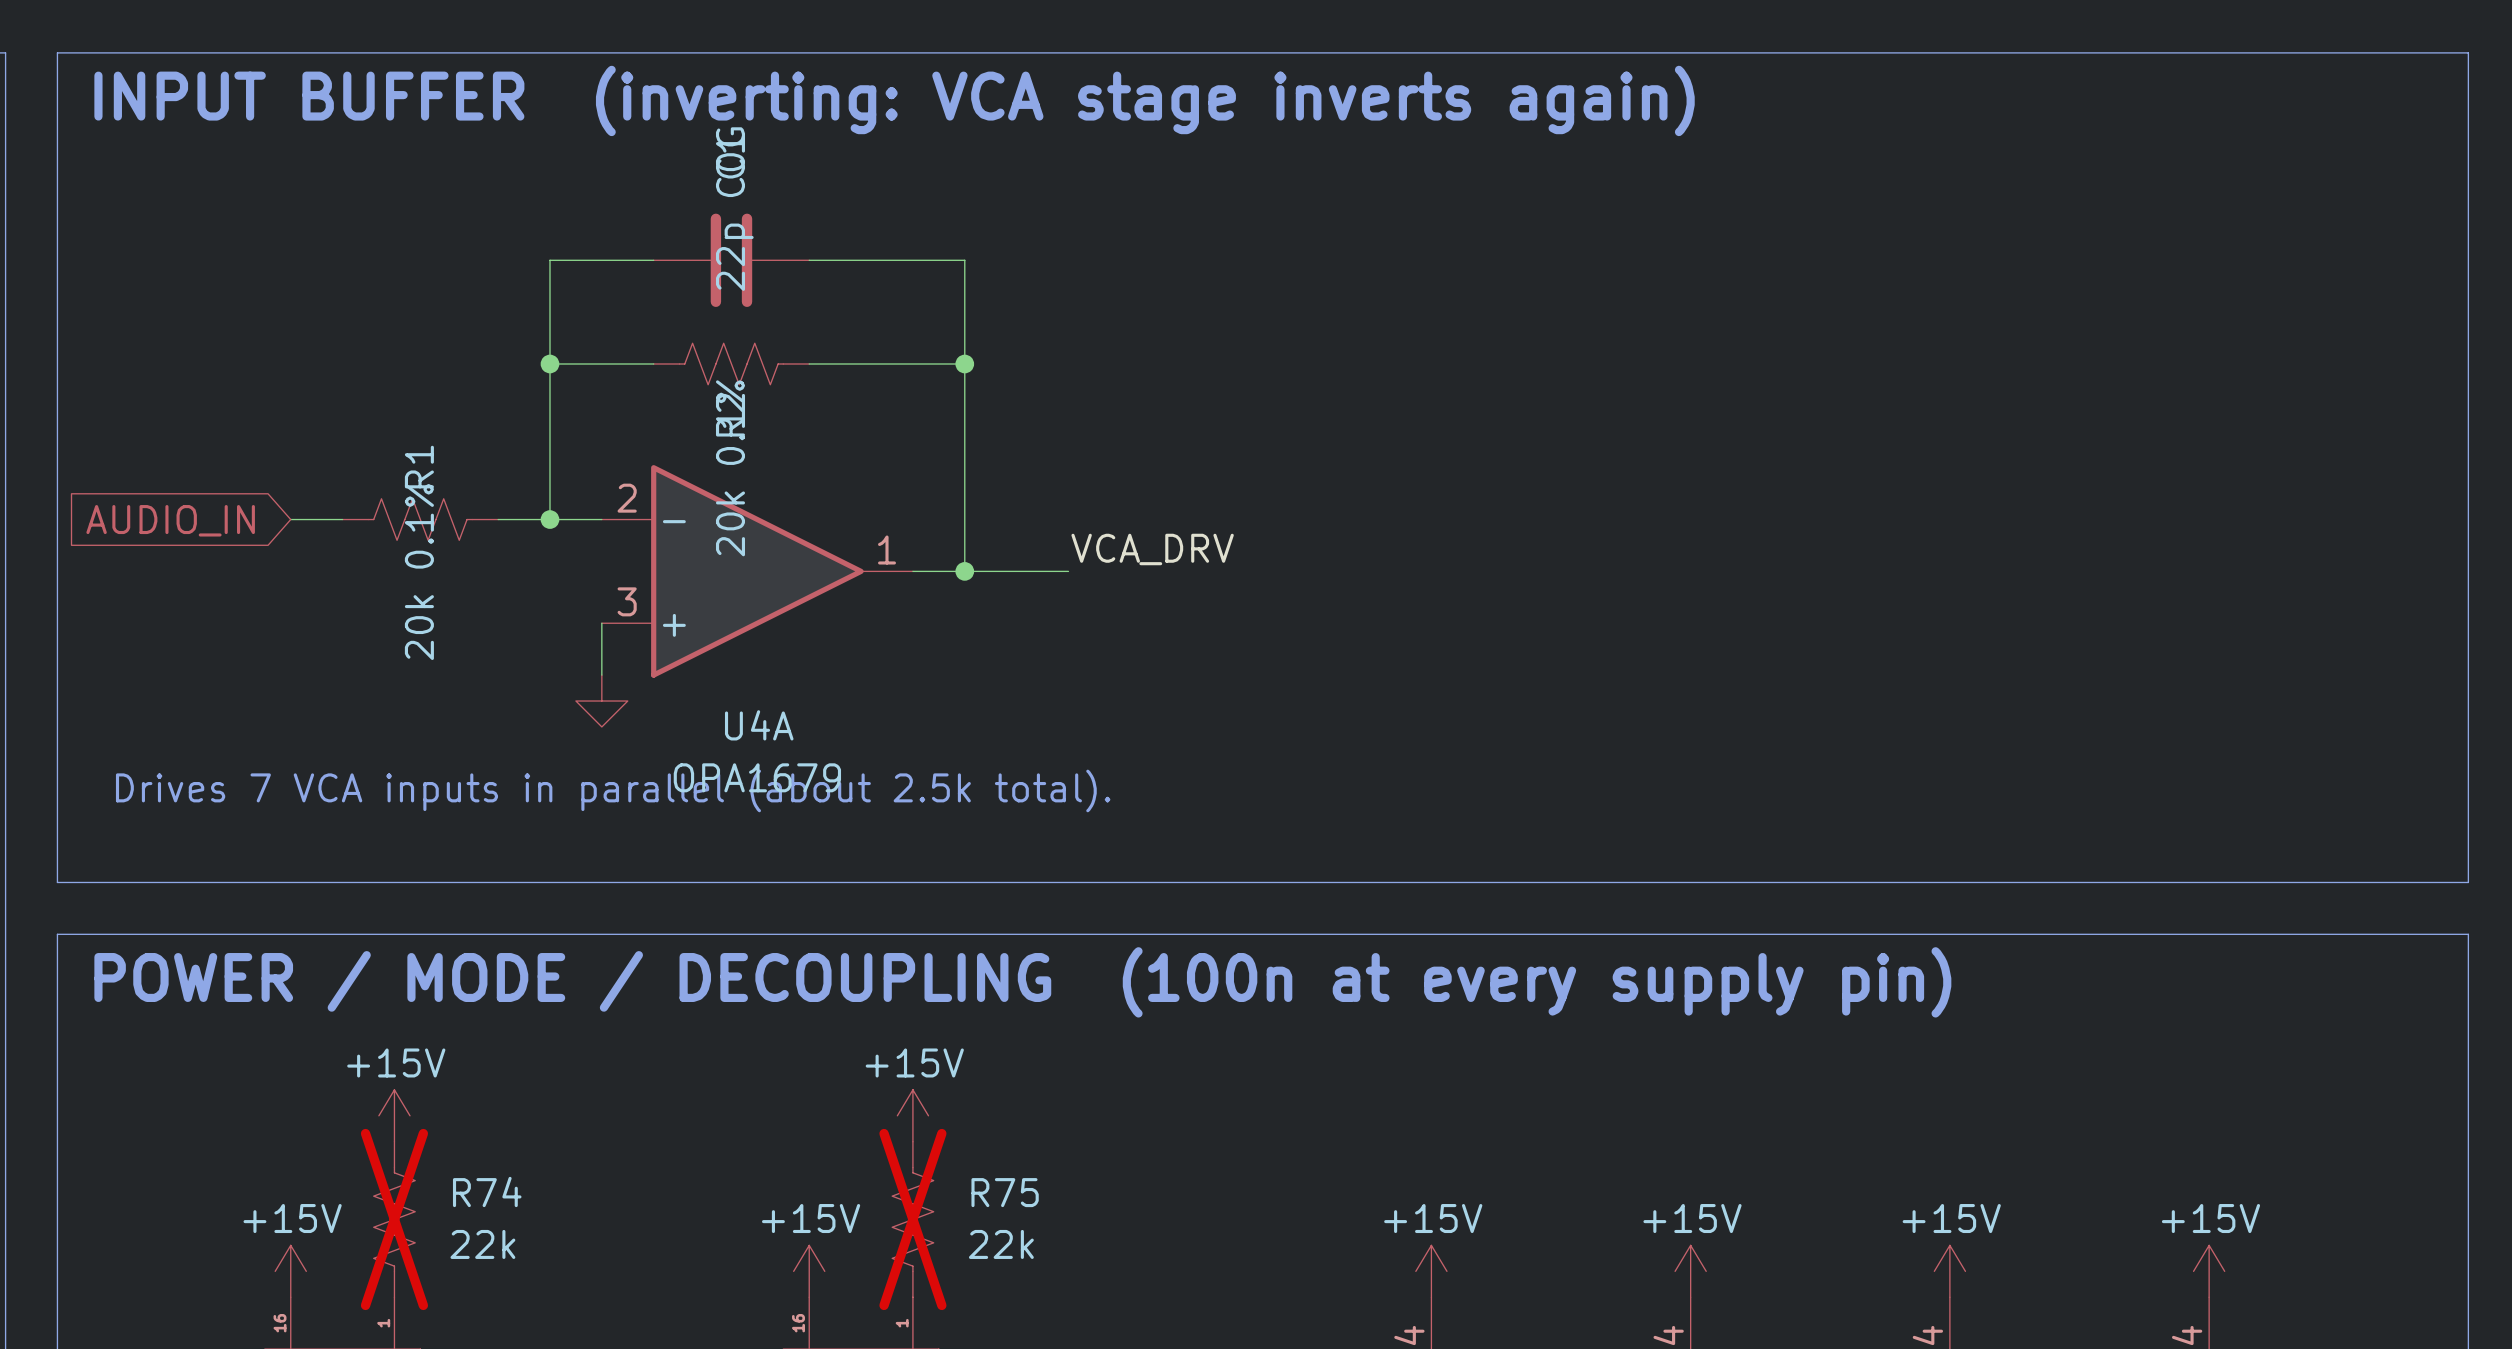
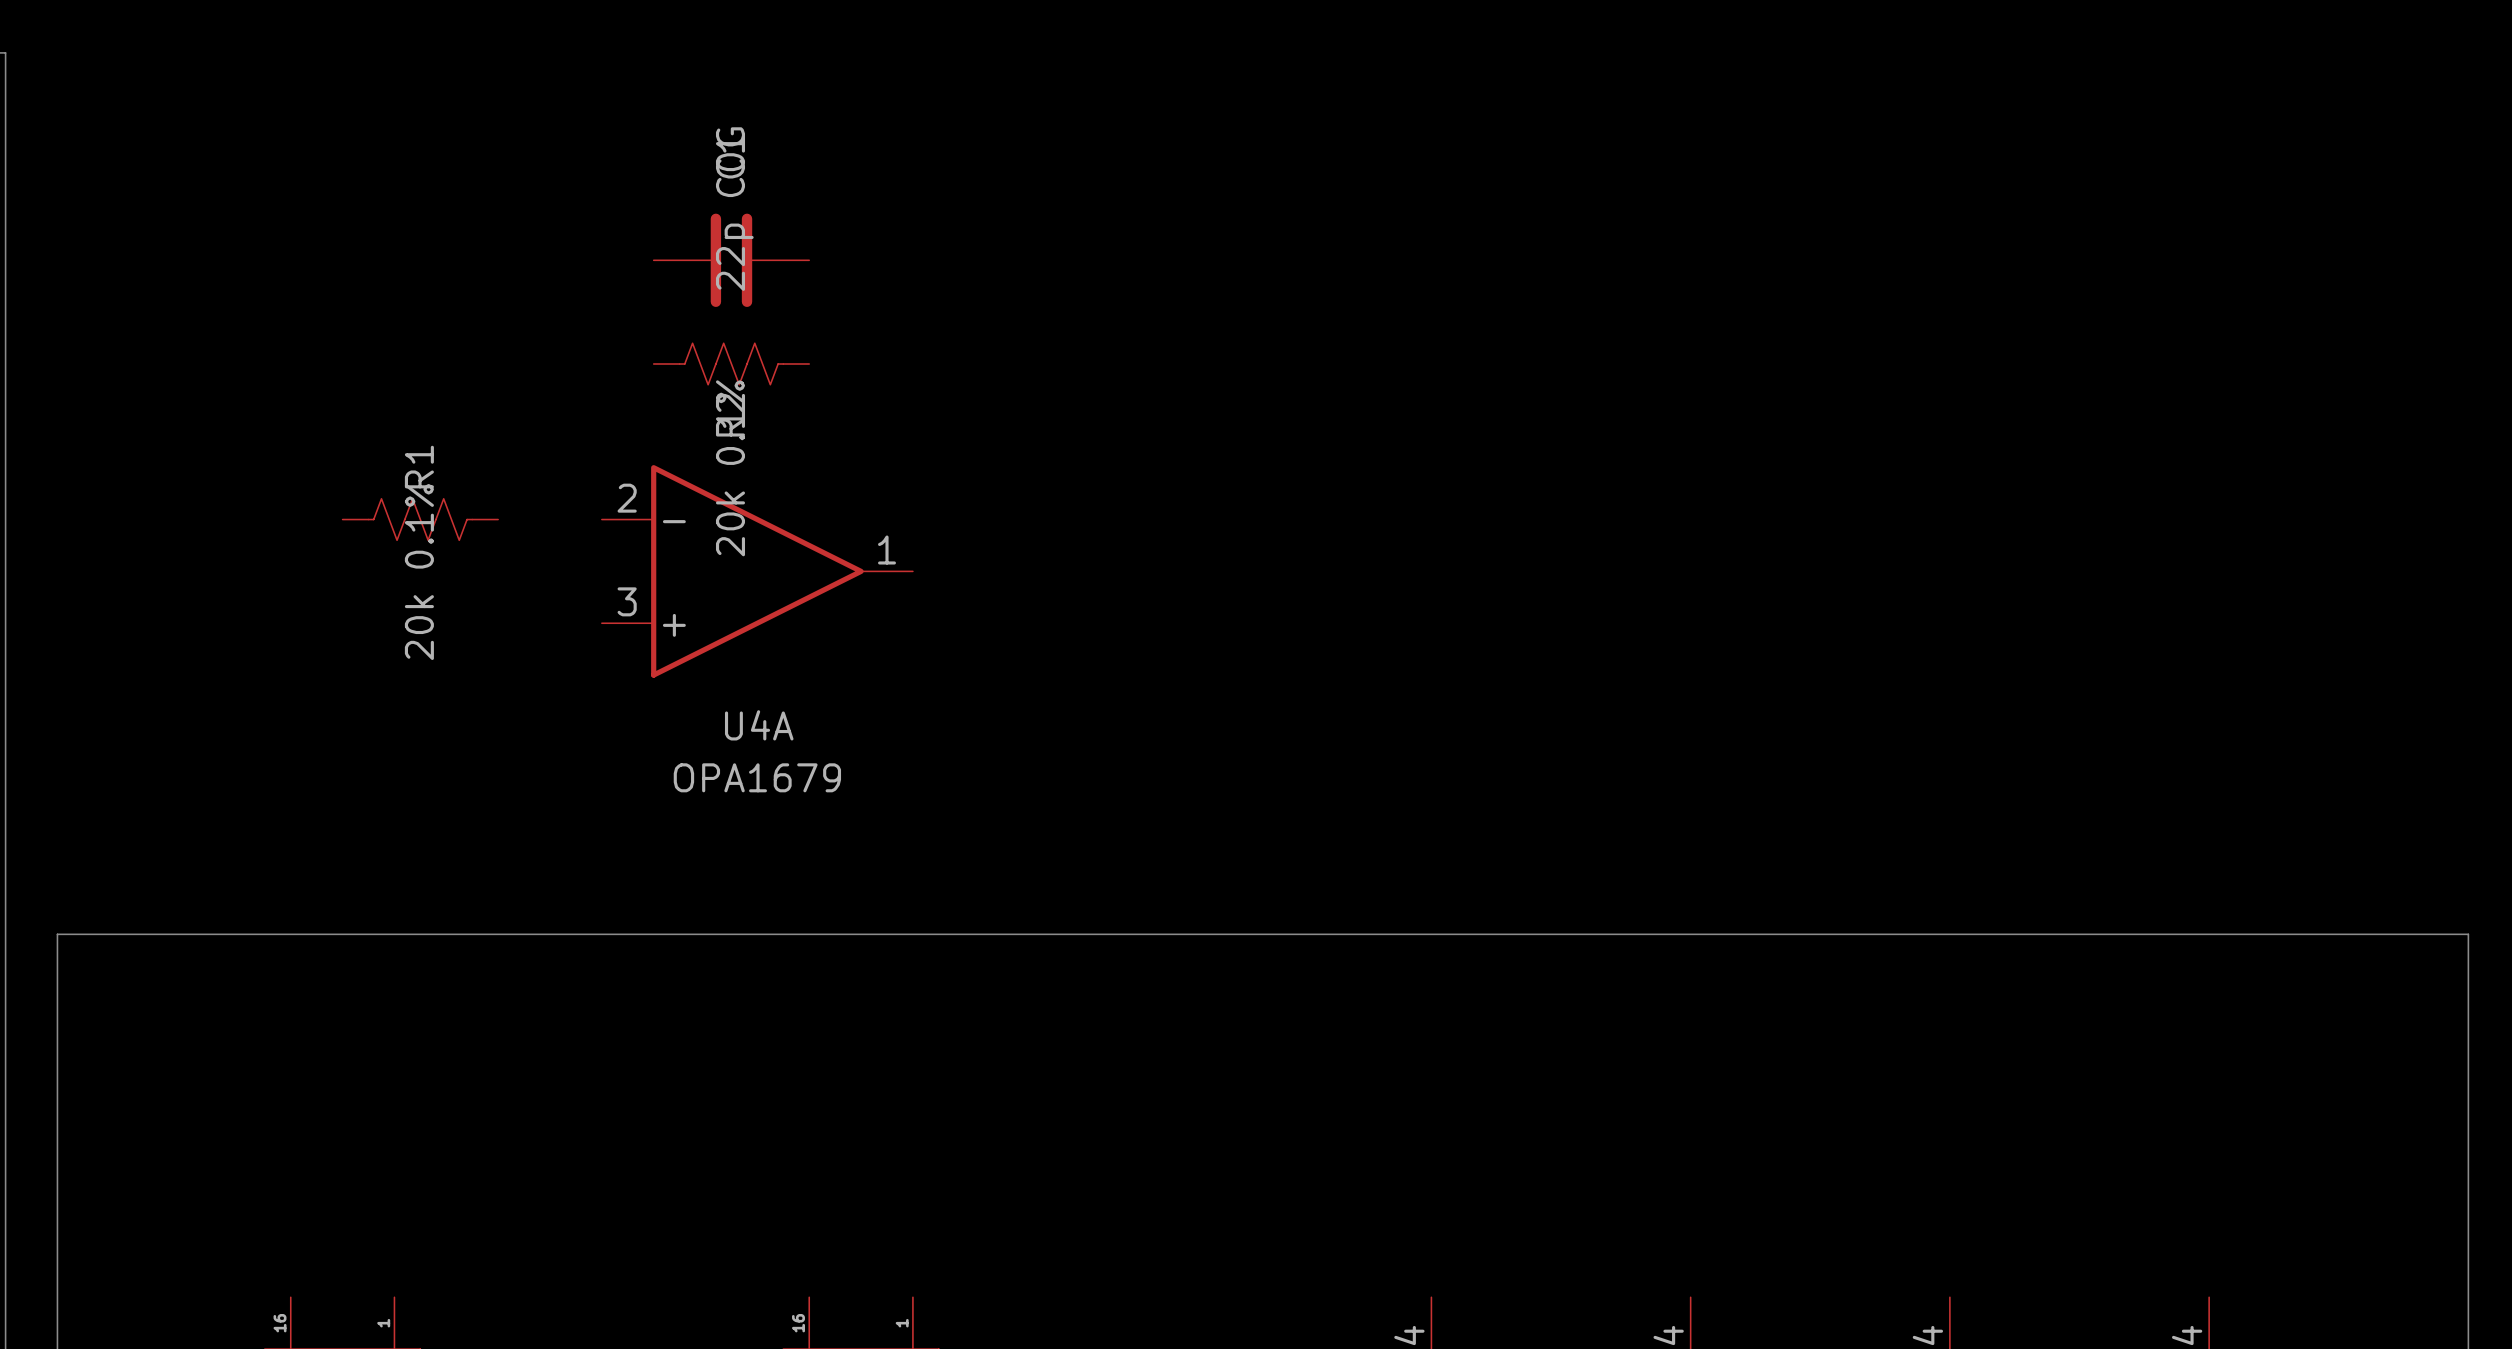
line: (57, 52) (2468, 52) (2468, 882) (57, 882) (57, 52) -> none
text: INPUT BUFFER (inverting: VCA stage inverts again) (894, 100) -> none
wire: (653, 260) (549, 260) (549, 519) -> none
wire: (809, 260) (964, 260) (964, 571) -> none
wire: (549, 364) (653, 364) -> none
junction: (549, 364) -> none
wire: (809, 364) (964, 364) -> none
junction: (964, 364) -> none
wire: (290, 519) (342, 519) -> none
wire: (498, 519) (601, 519) -> none
junction: (549, 519) -> none
global label: AUDIO_IN (170, 520) -> none
label: VCA_DRV (1152, 549) -> none
wire: (912, 571) (1068, 571) -> none
junction: (964, 571) -> none
wire: (601, 623) (601, 675) -> none
power symbol: (601, 701) -> none
text: Drives 7 VCA inputs in parallel (about 2.5k total). (613, 790) -> none
text: POWER / MODE / DECOUPLING (100n at every supply pin) (1022, 982) -> none
power symbol: +15V (394, 1115) -> none
power symbol: +15V (912, 1115) -> none
R74: 22k (394, 1219) -> none
R75: 22k (912, 1219) -> none
power symbol: +15V (290, 1271) -> none
power symbol: +15V (809, 1271) -> none
power symbol: +15V (1431, 1271) -> none
power symbol: +15V (1690, 1271) -> none
power symbol: +15V (1949, 1271) -> none
power symbol: +15V (2209, 1271) -> none

